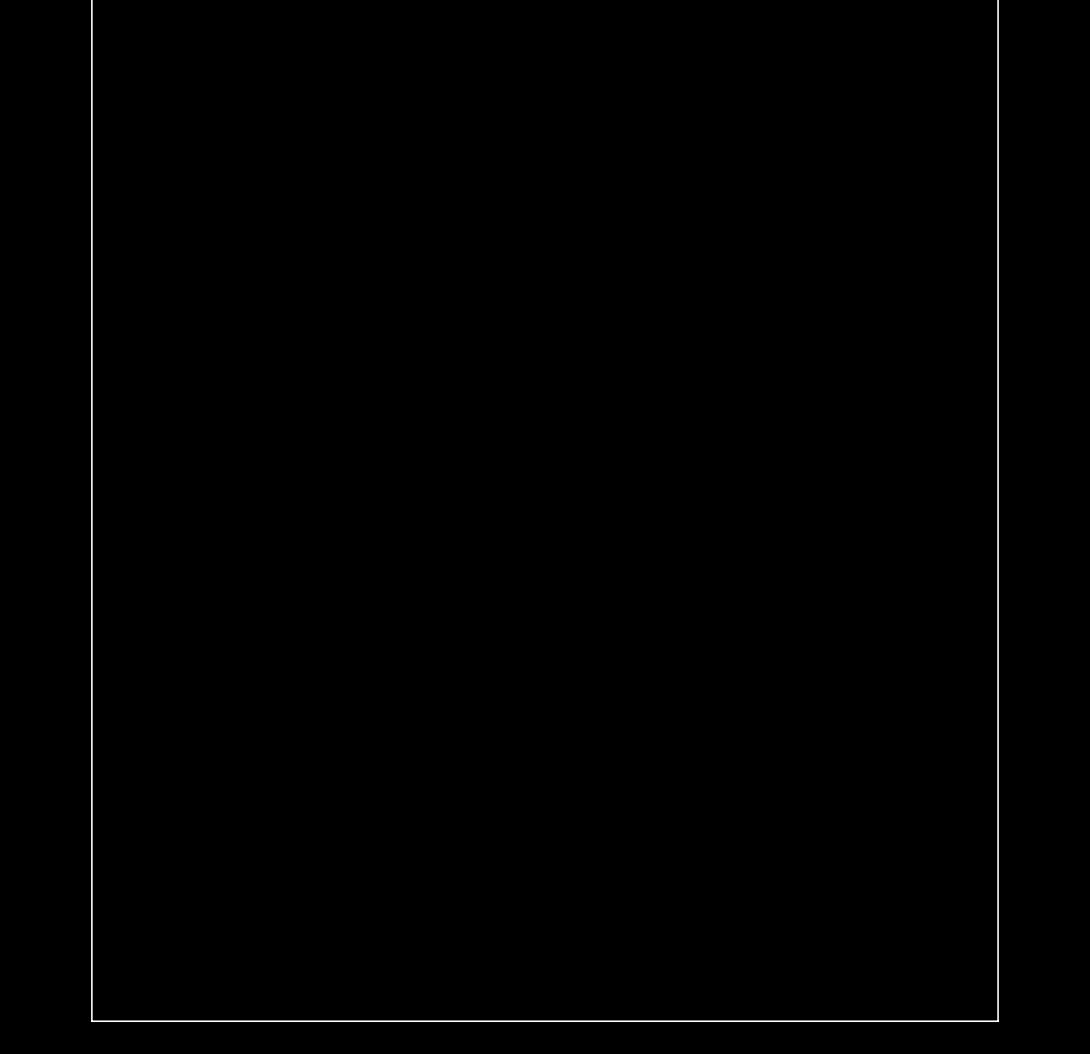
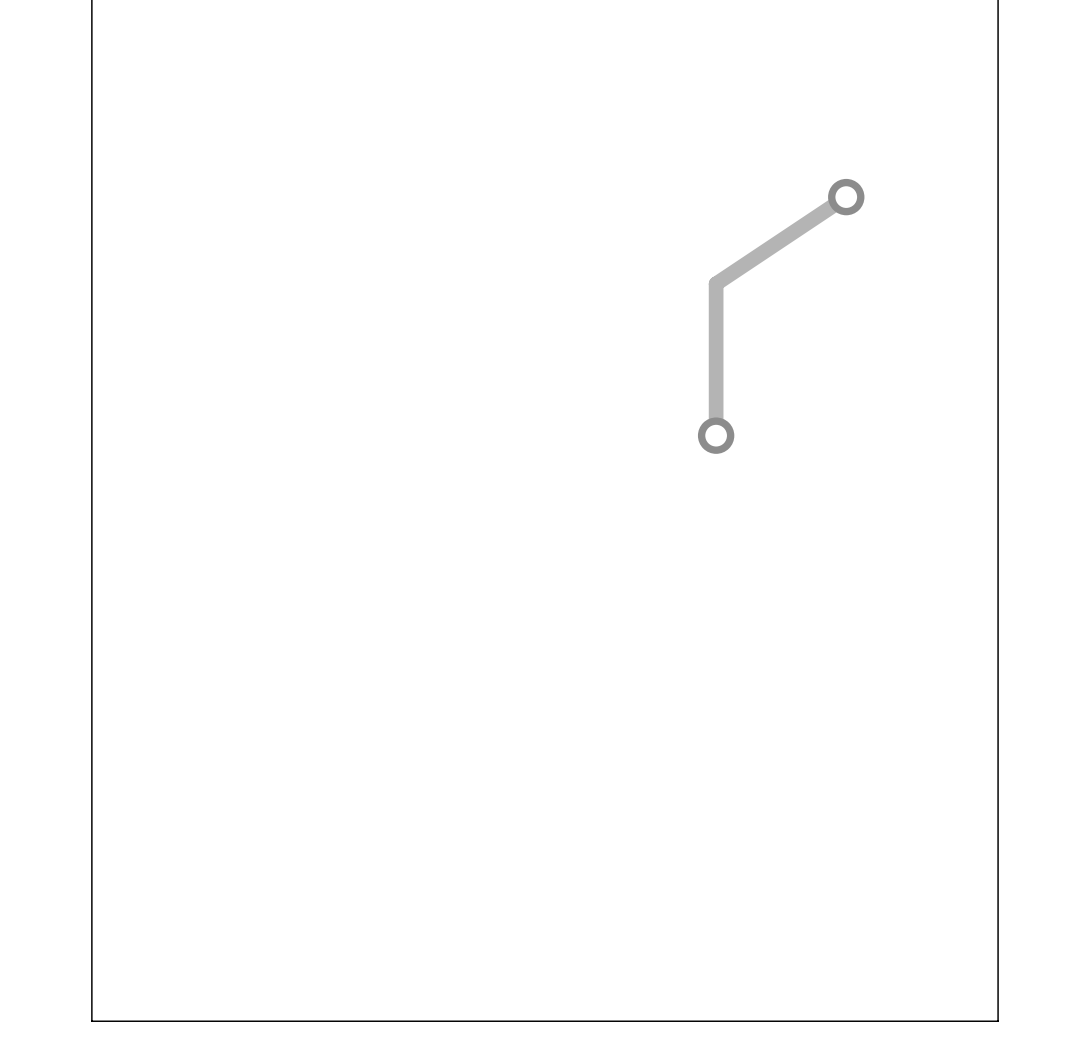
track: none -> (846, 197) (716, 283) (716, 435)
via: none -> (846, 197)
via: none -> (716, 435)

